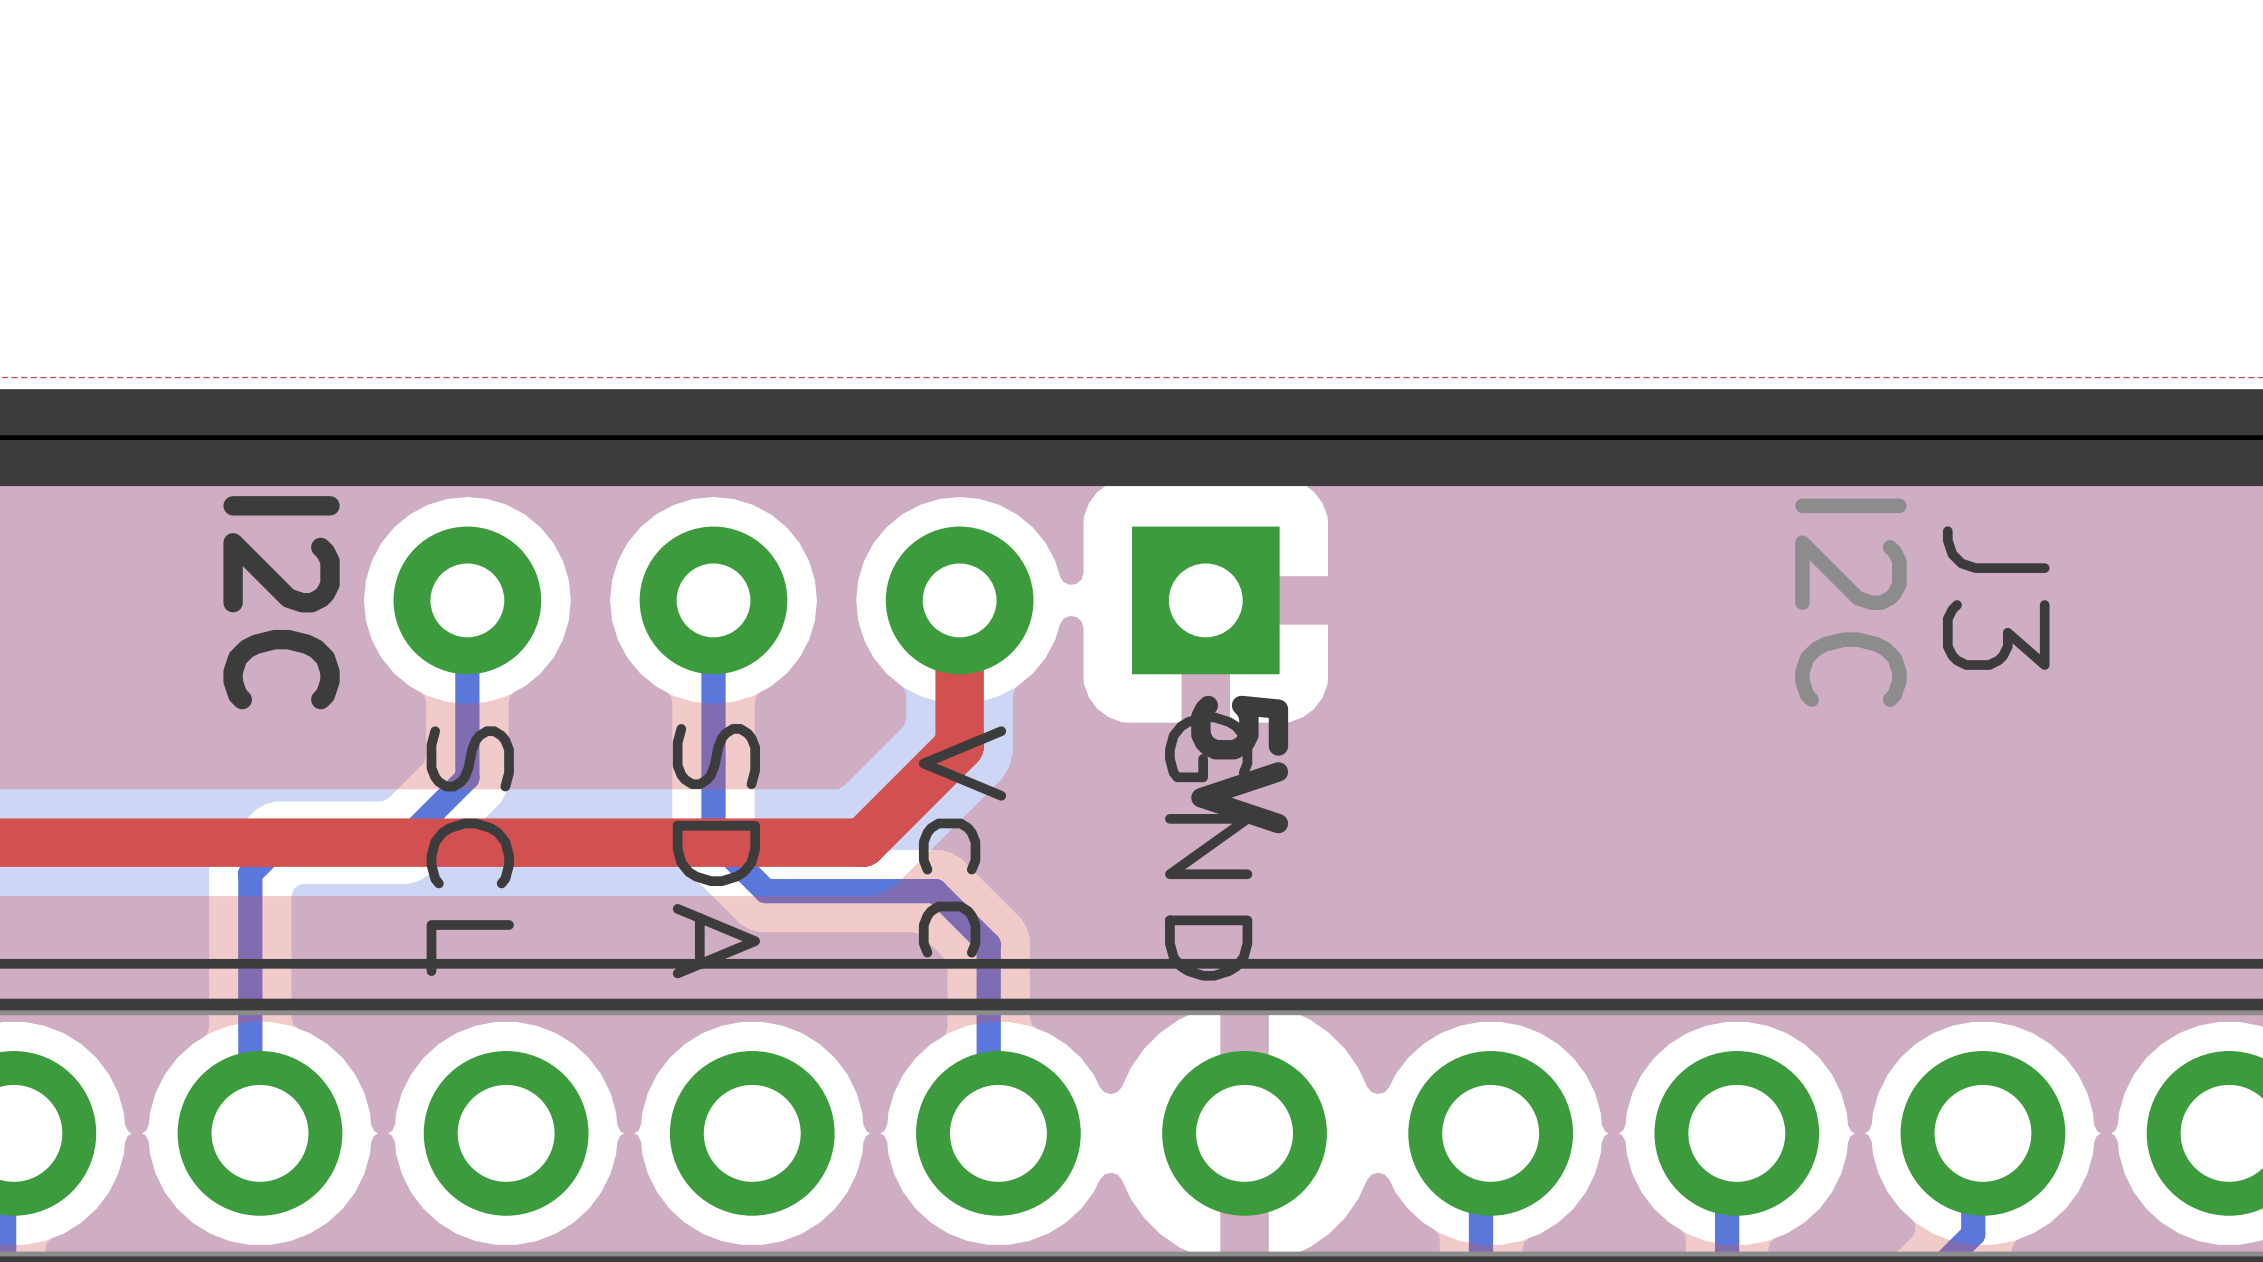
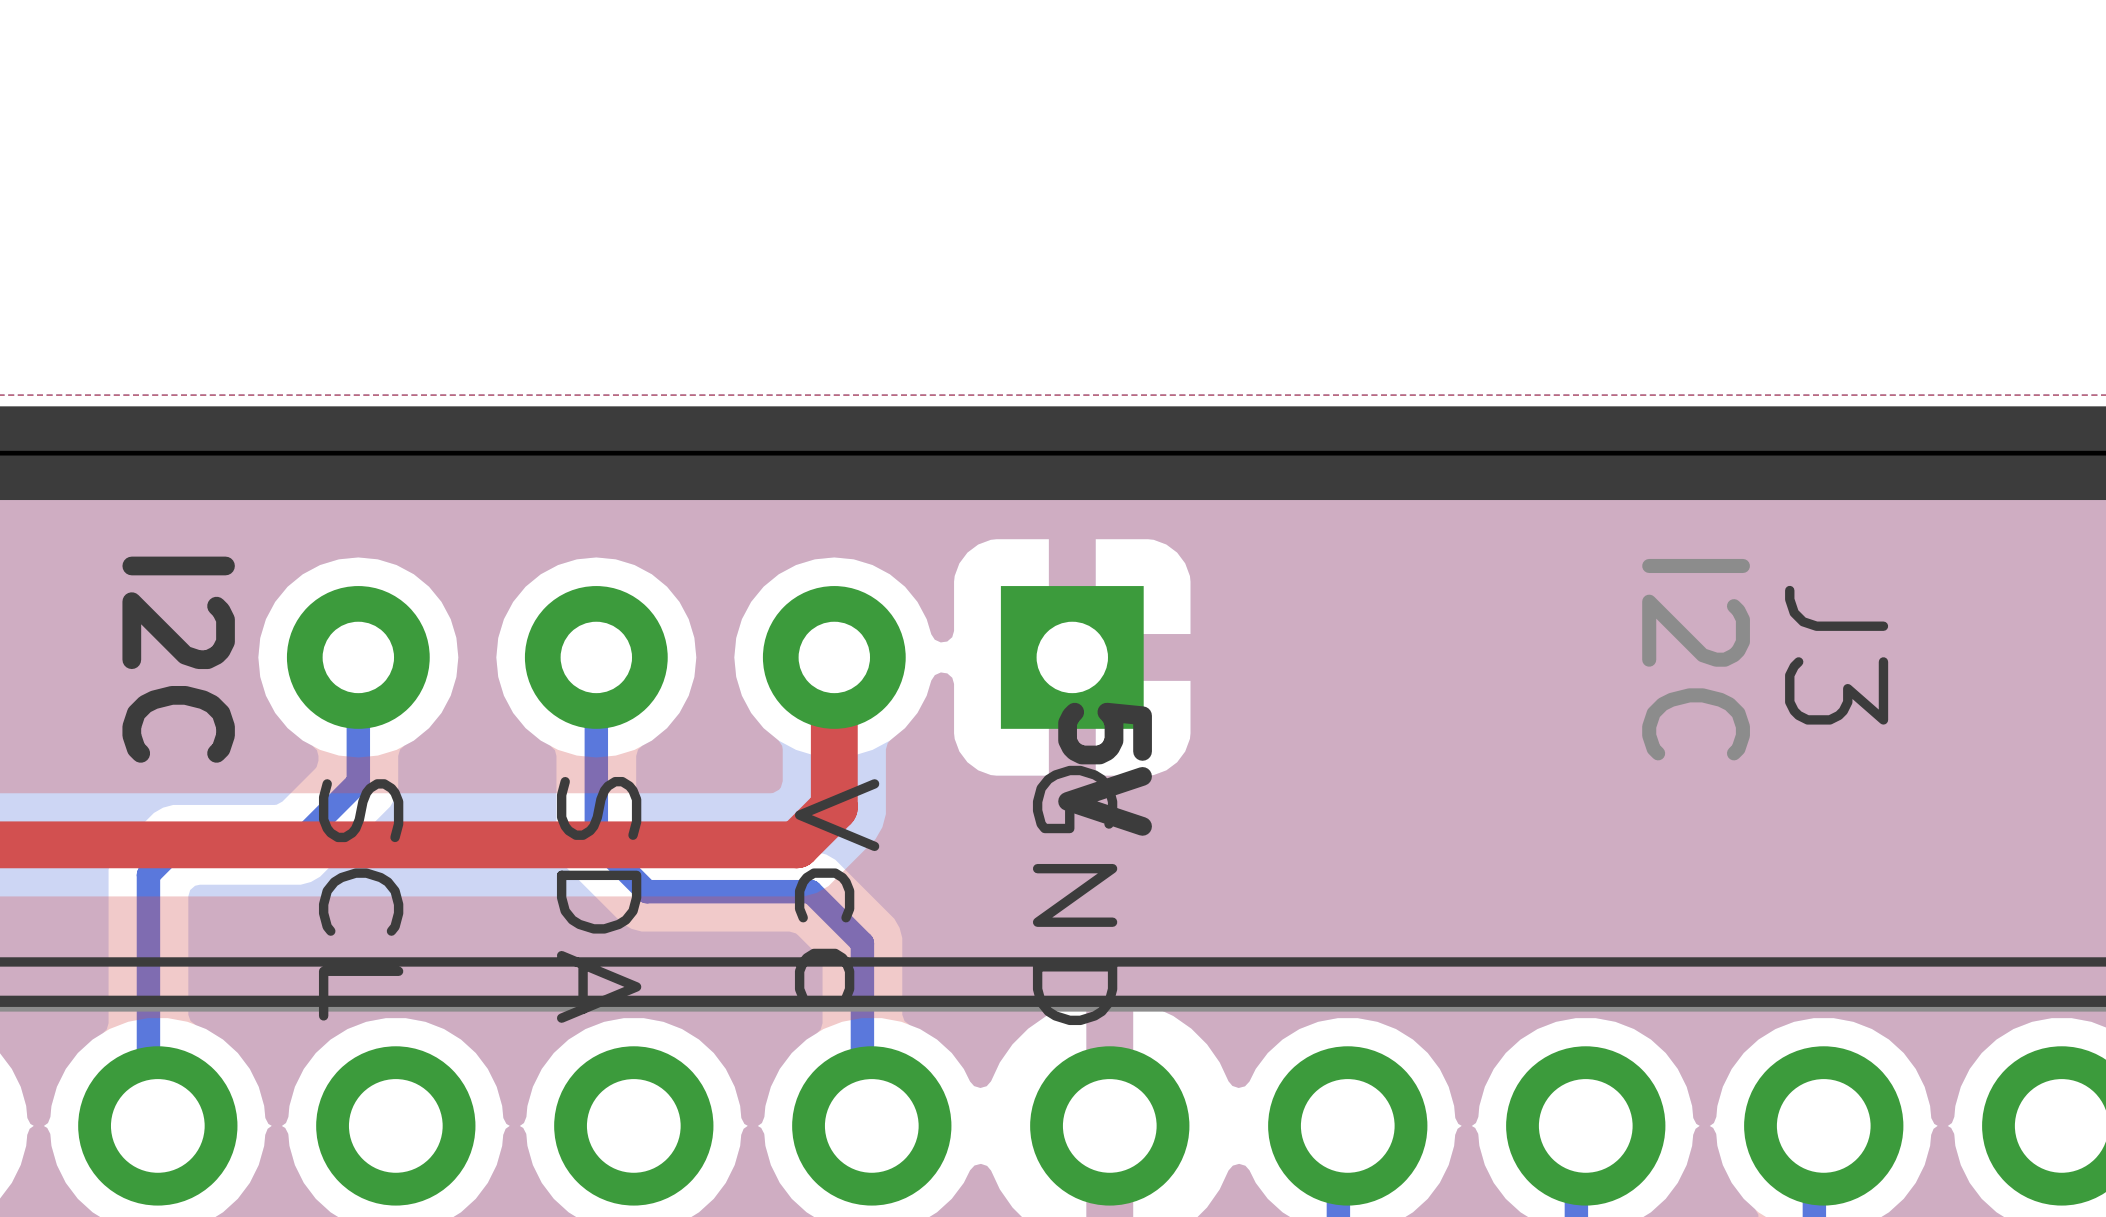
J3 position: (836, 600) -> (715, 657)
top track: (959, 745) (862, 842) -> (834, 751) (834, 807) (796, 844) (740, 844)

